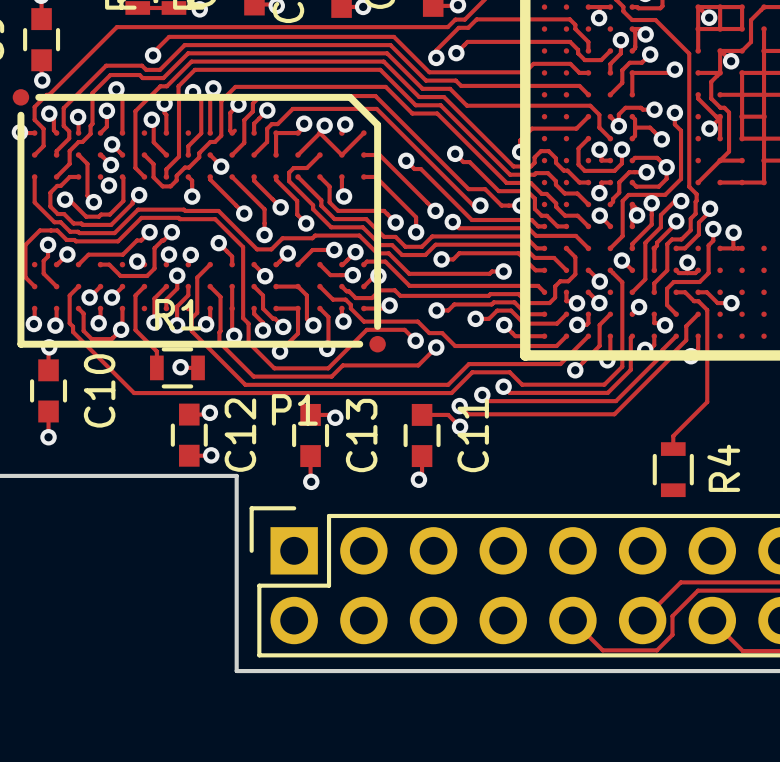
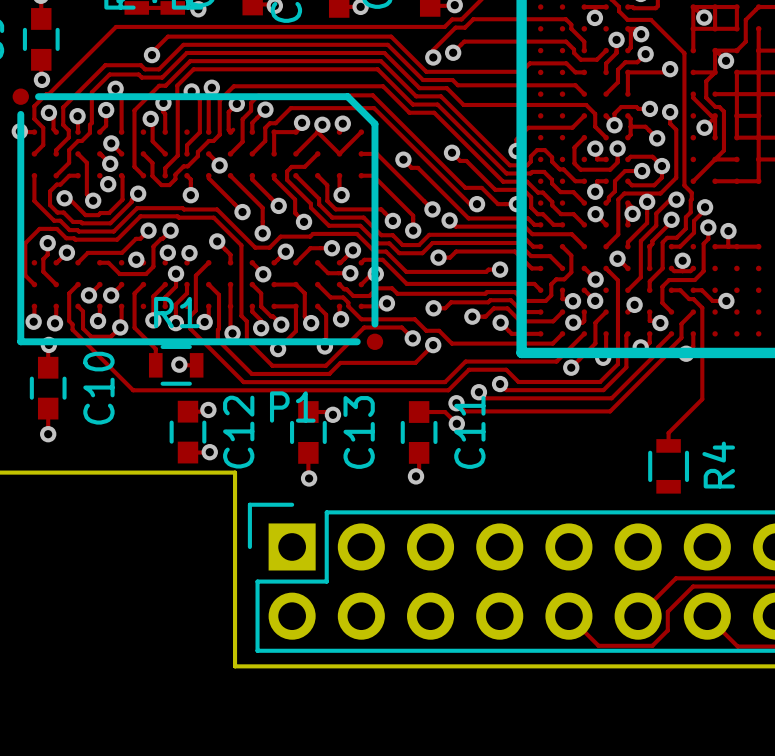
track: none -> (736, 246) (758, 246)

